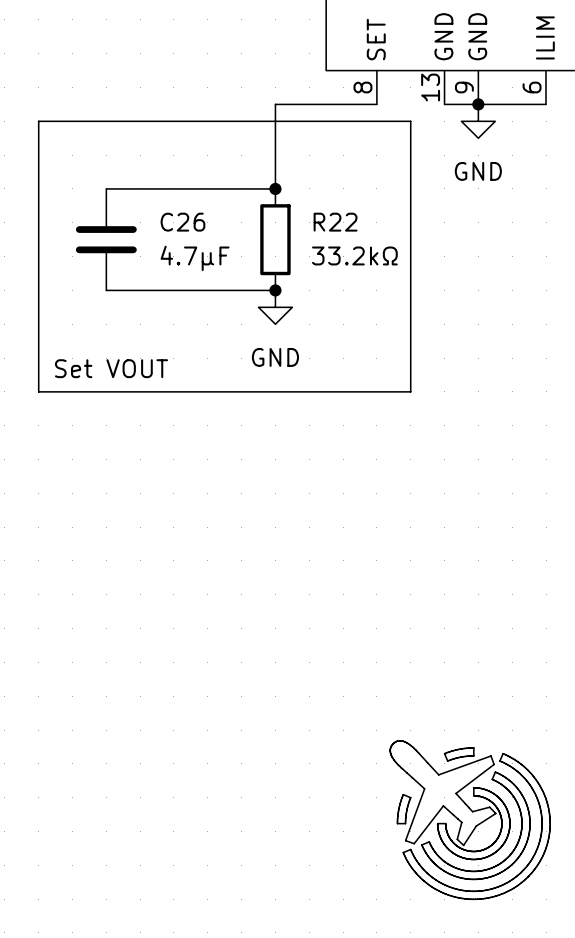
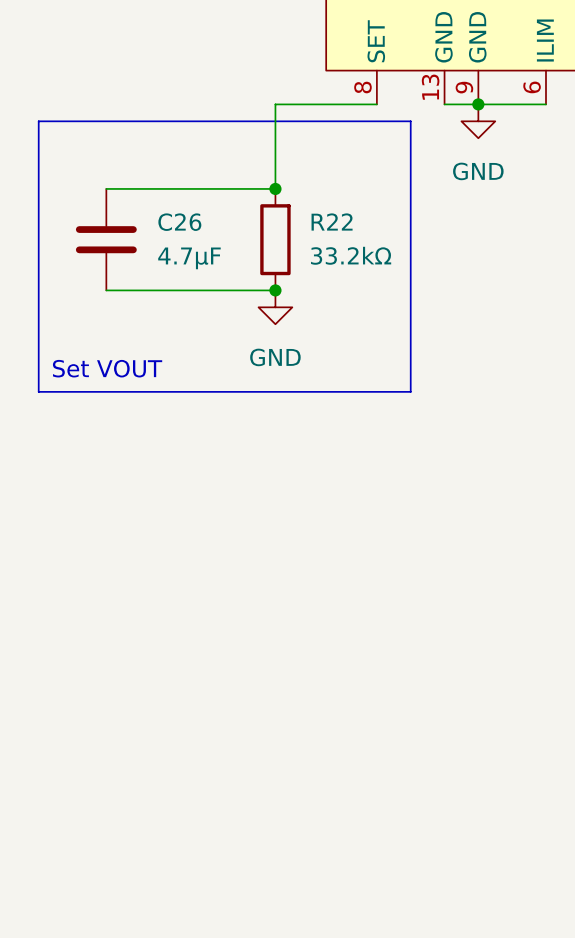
line: (398, 740) (391, 746) (391, 756) (424, 788) (405, 840) (414, 843) (443, 805) (461, 822) (457, 839) (463, 845) (476, 826) (495, 813) (489, 807) (472, 811) (455, 793) (494, 764) (491, 756) (438, 774) (412, 747) (405, 742) (398, 740) -> none
line: (471, 747) (457, 749) (444, 753) (447, 761) (473, 755) (473, 747) (471, 747) -> none
line: (503, 753) (499, 761) (523, 776) (532, 788) (538, 802) (542, 826) (536, 851) (525, 867) (511, 880) (493, 888) (473, 891) (457, 889) (440, 882) (423, 869) (410, 849) (403, 852) (419, 877) (442, 892) (471, 899) (501, 894) (526, 878) (543, 854) (548, 840) (550, 823) (544, 794) (527, 770) (503, 753) -> none
line: (495, 772) (492, 779) (508, 790) (519, 808) (521, 825) (517, 842) (510, 854) (500, 863) (488, 869) (475, 871) (461, 869) (447, 863) (436, 853) (429, 841) (421, 844) (434, 863) (451, 874) (472, 879) (494, 875) (512, 864) (525, 846) (530, 824) (526, 803) (514, 785) (495, 772) -> none
line: (473, 787) (473, 795) (489, 800) (500, 814) (501, 829) (493, 843) (479, 850) (464, 849) (450, 839) (445, 823) (437, 823) (440, 837) (448, 848) (459, 856) (473, 859) (487, 856) (499, 848) (507, 837) (509, 823) (507, 809) (499, 798) (487, 790) (473, 787) -> none
line: (403, 794) (398, 808) (397, 823) (405, 823) (410, 797) (403, 794) -> none

